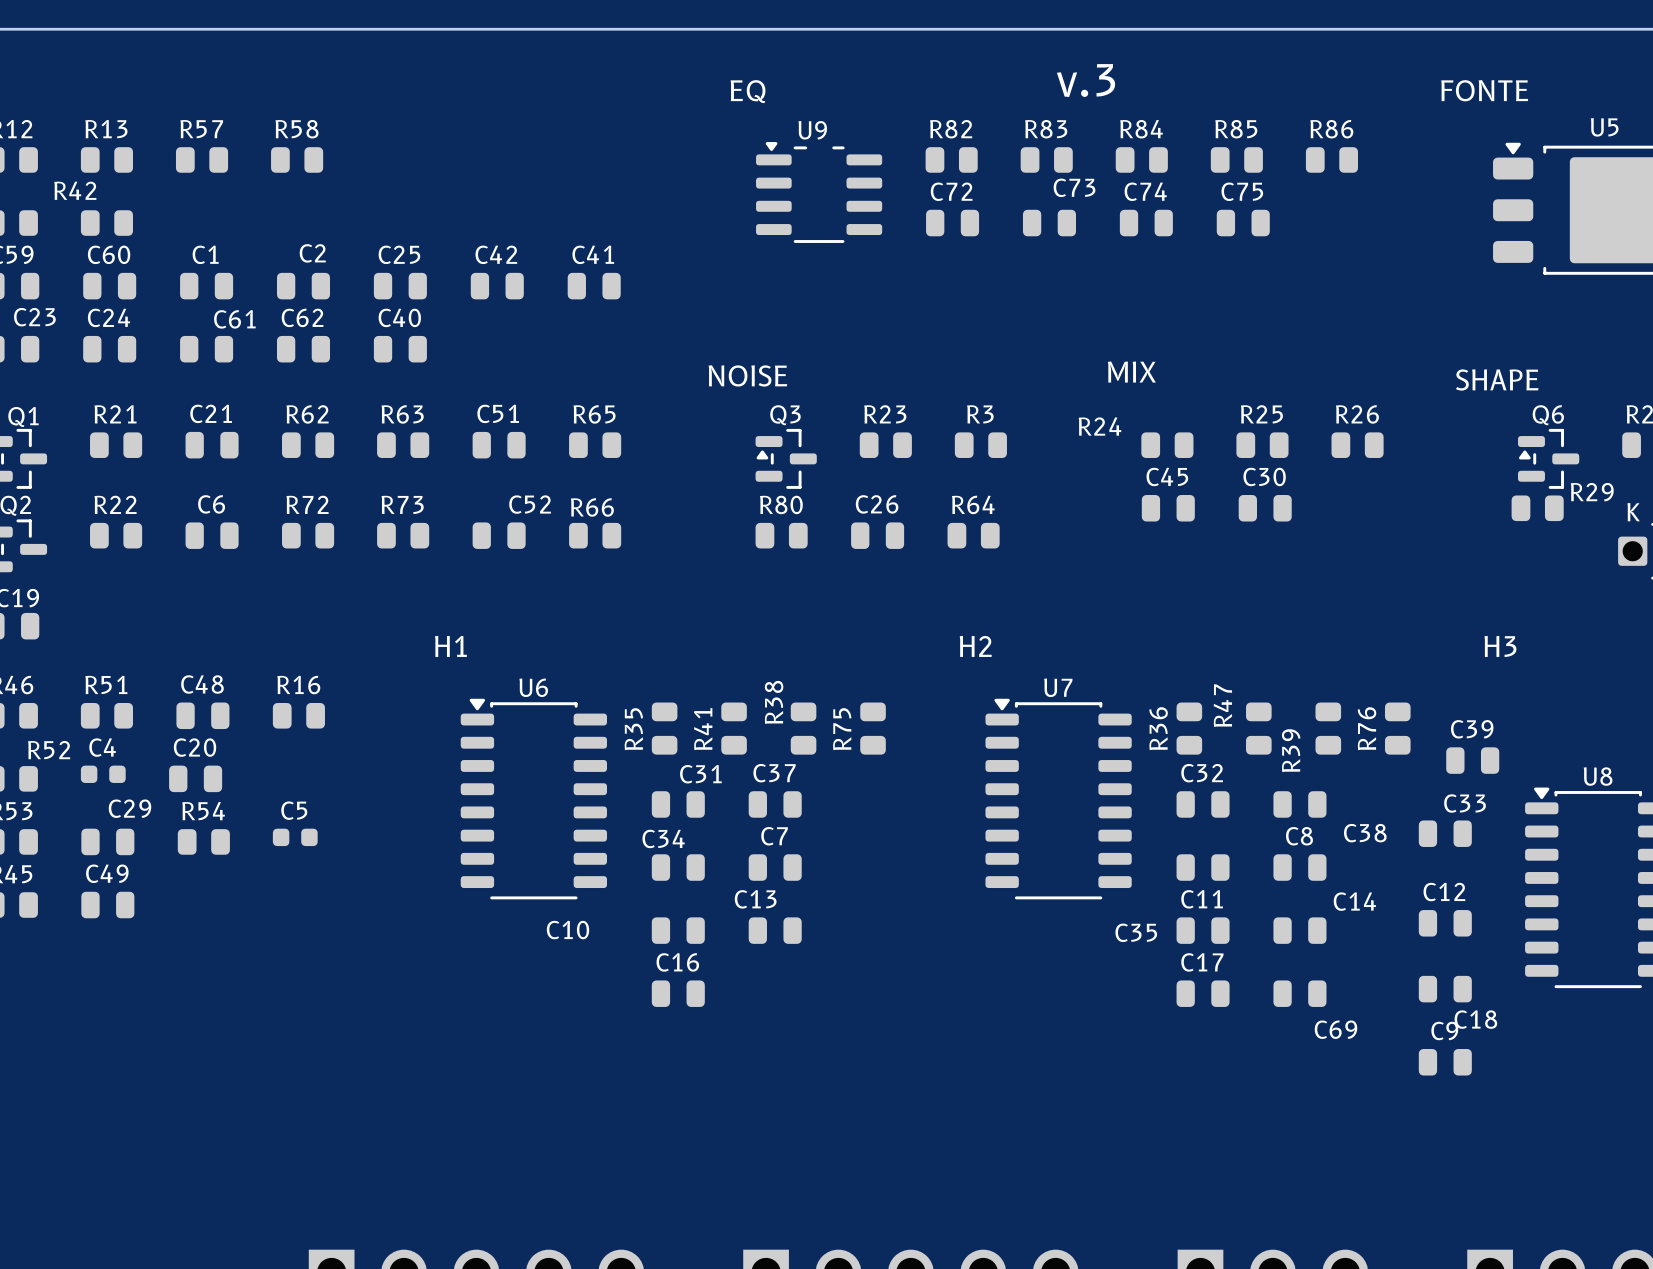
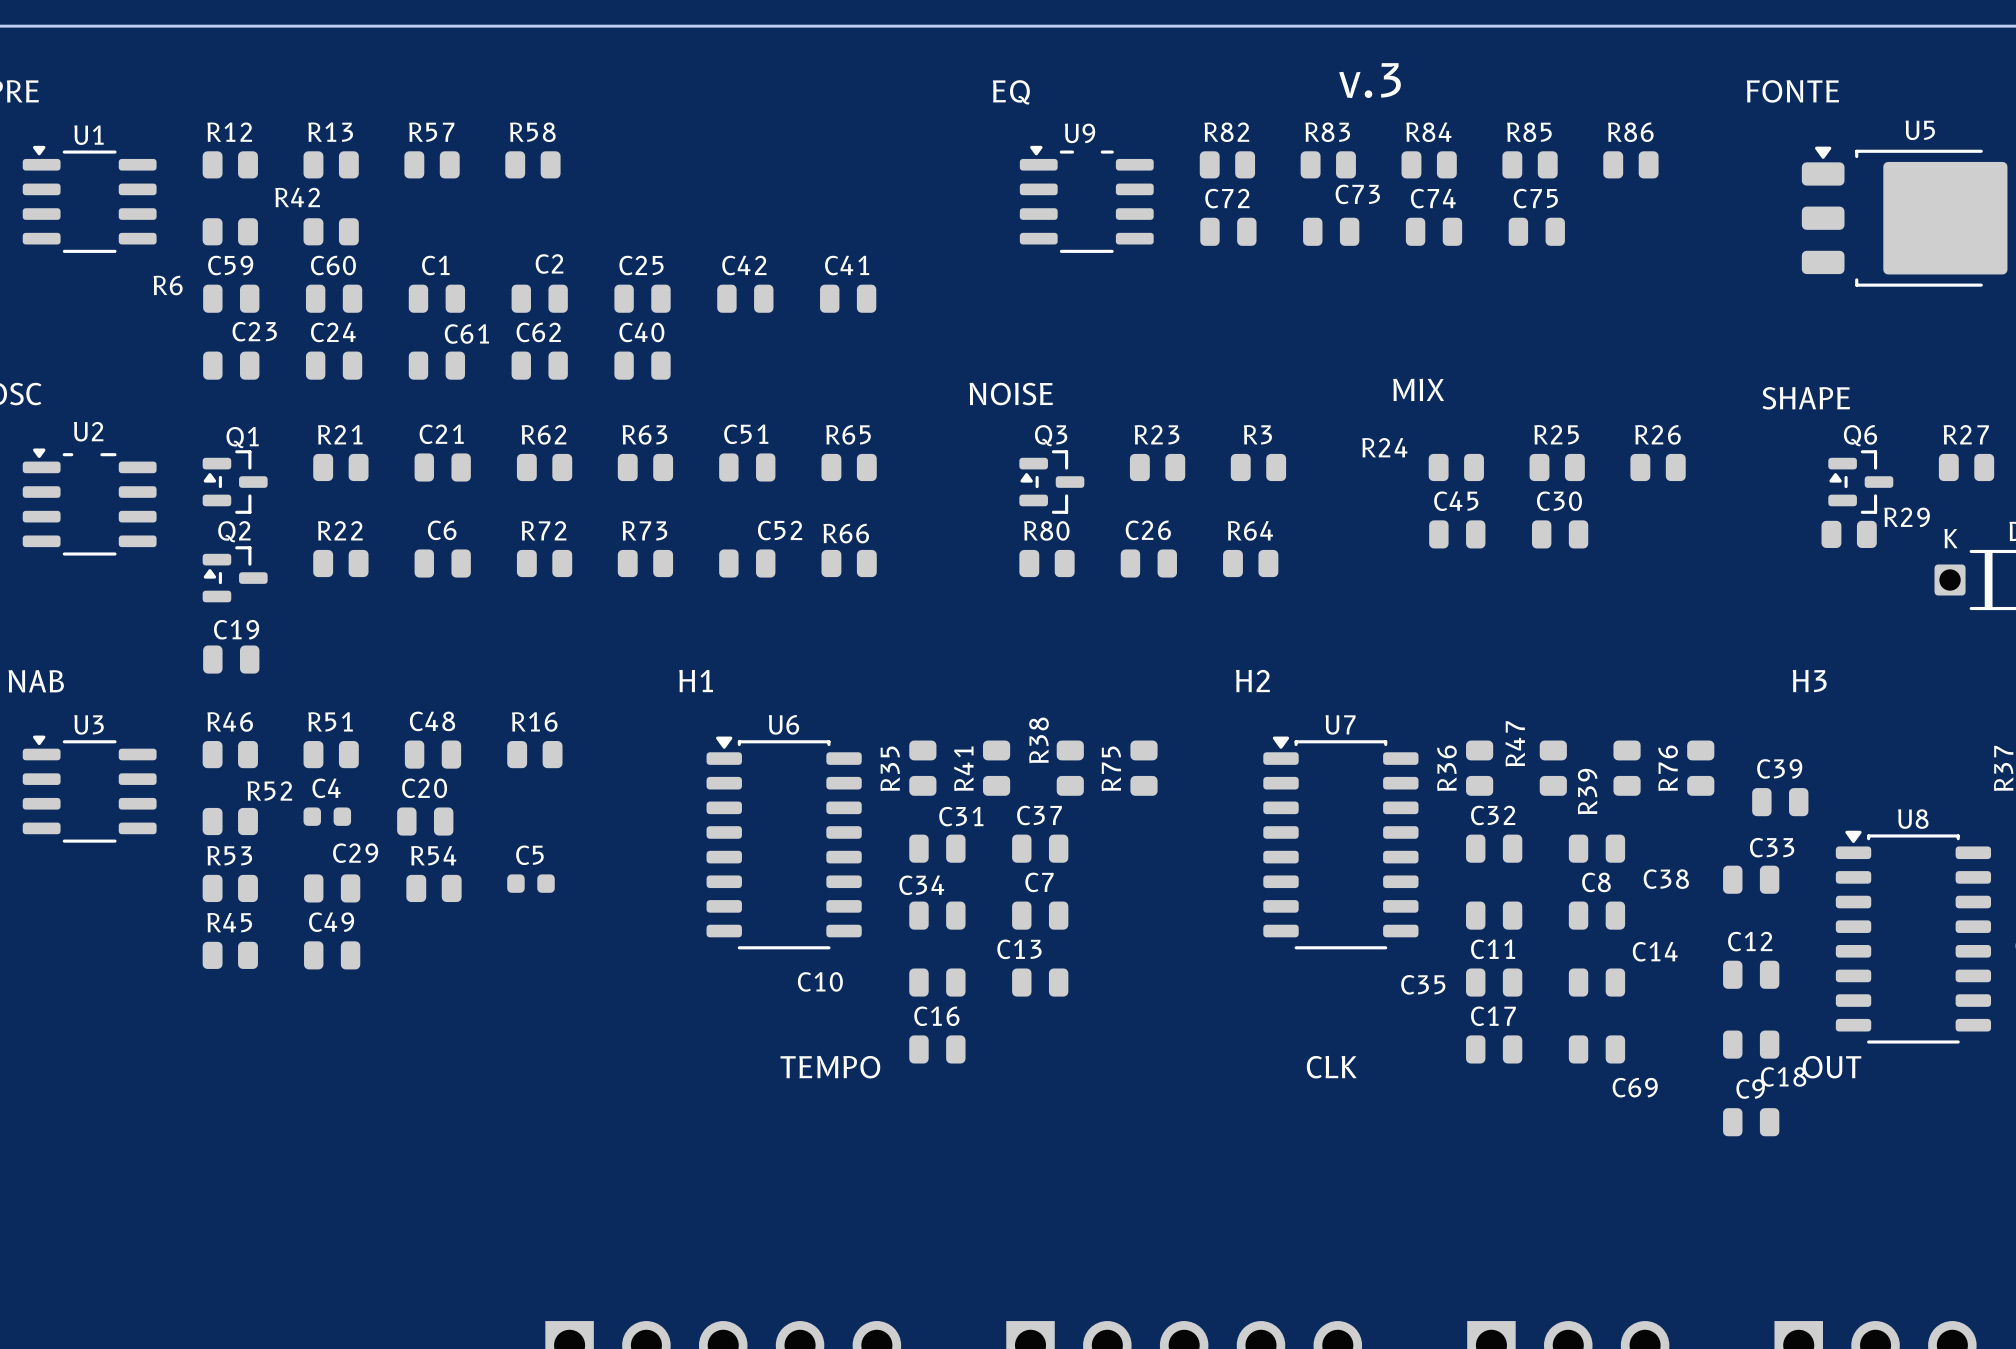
text: none -> TEMPO (830, 1067)
text: none -> CLK (1331, 1067)
text: none -> OUT (1831, 1067)

